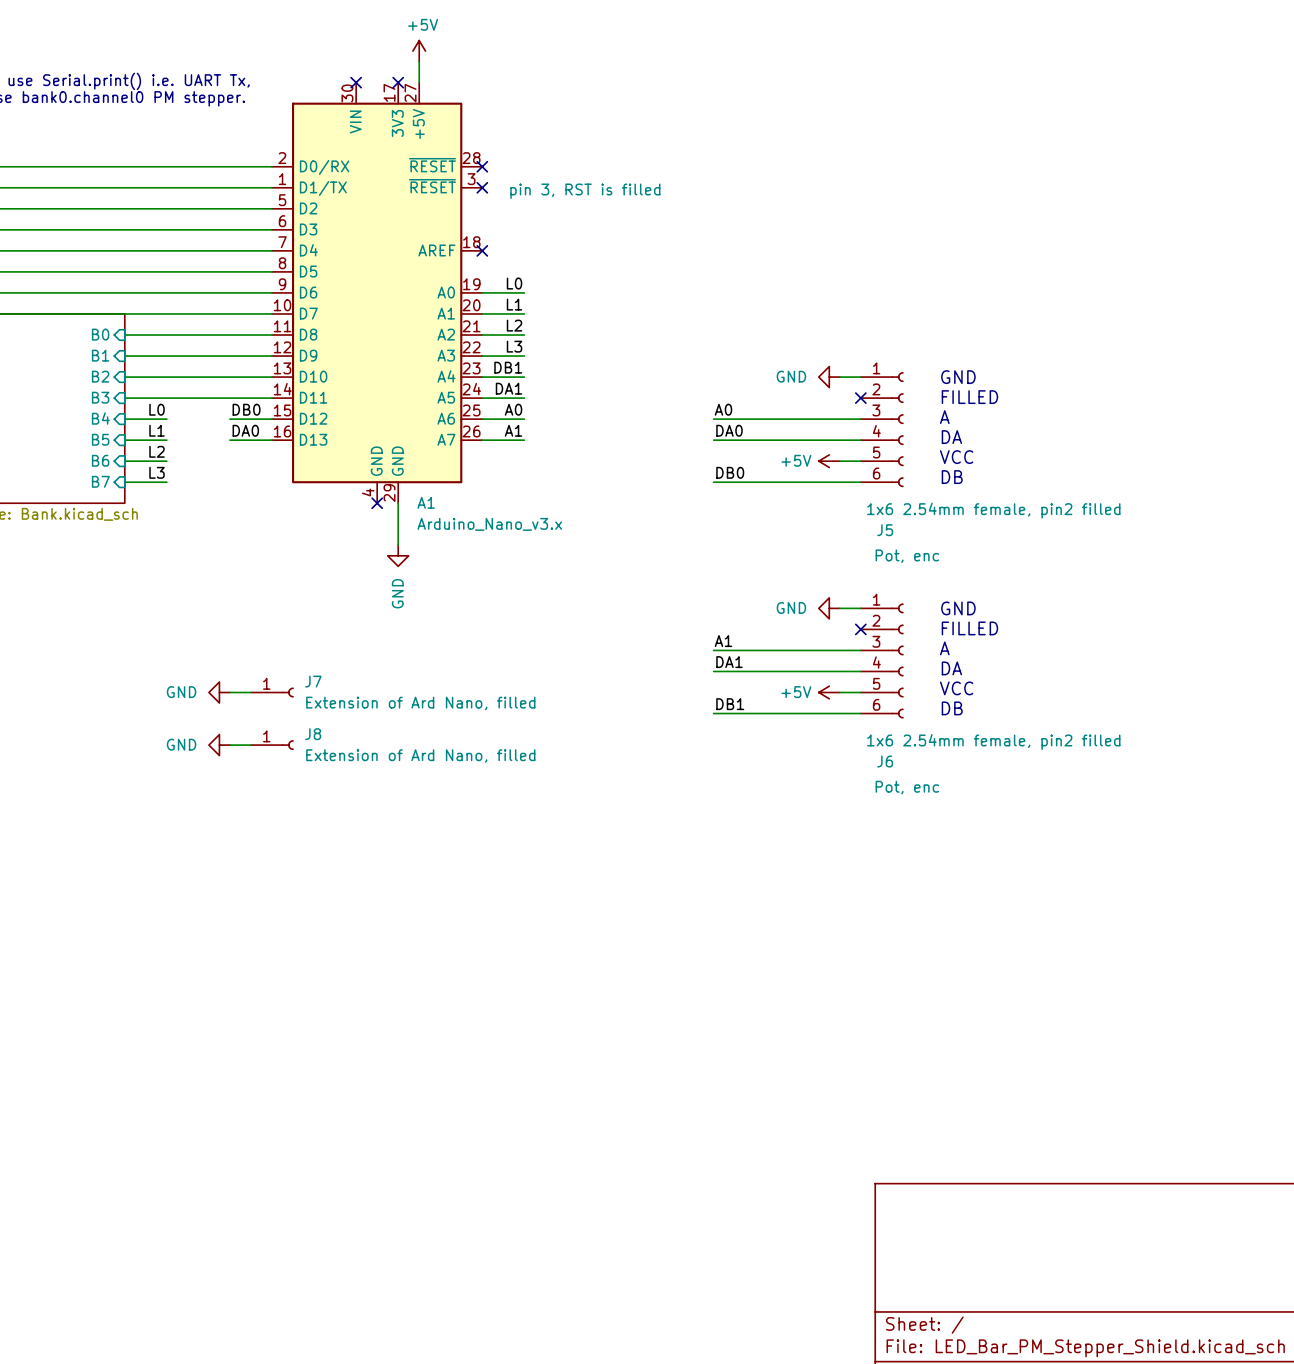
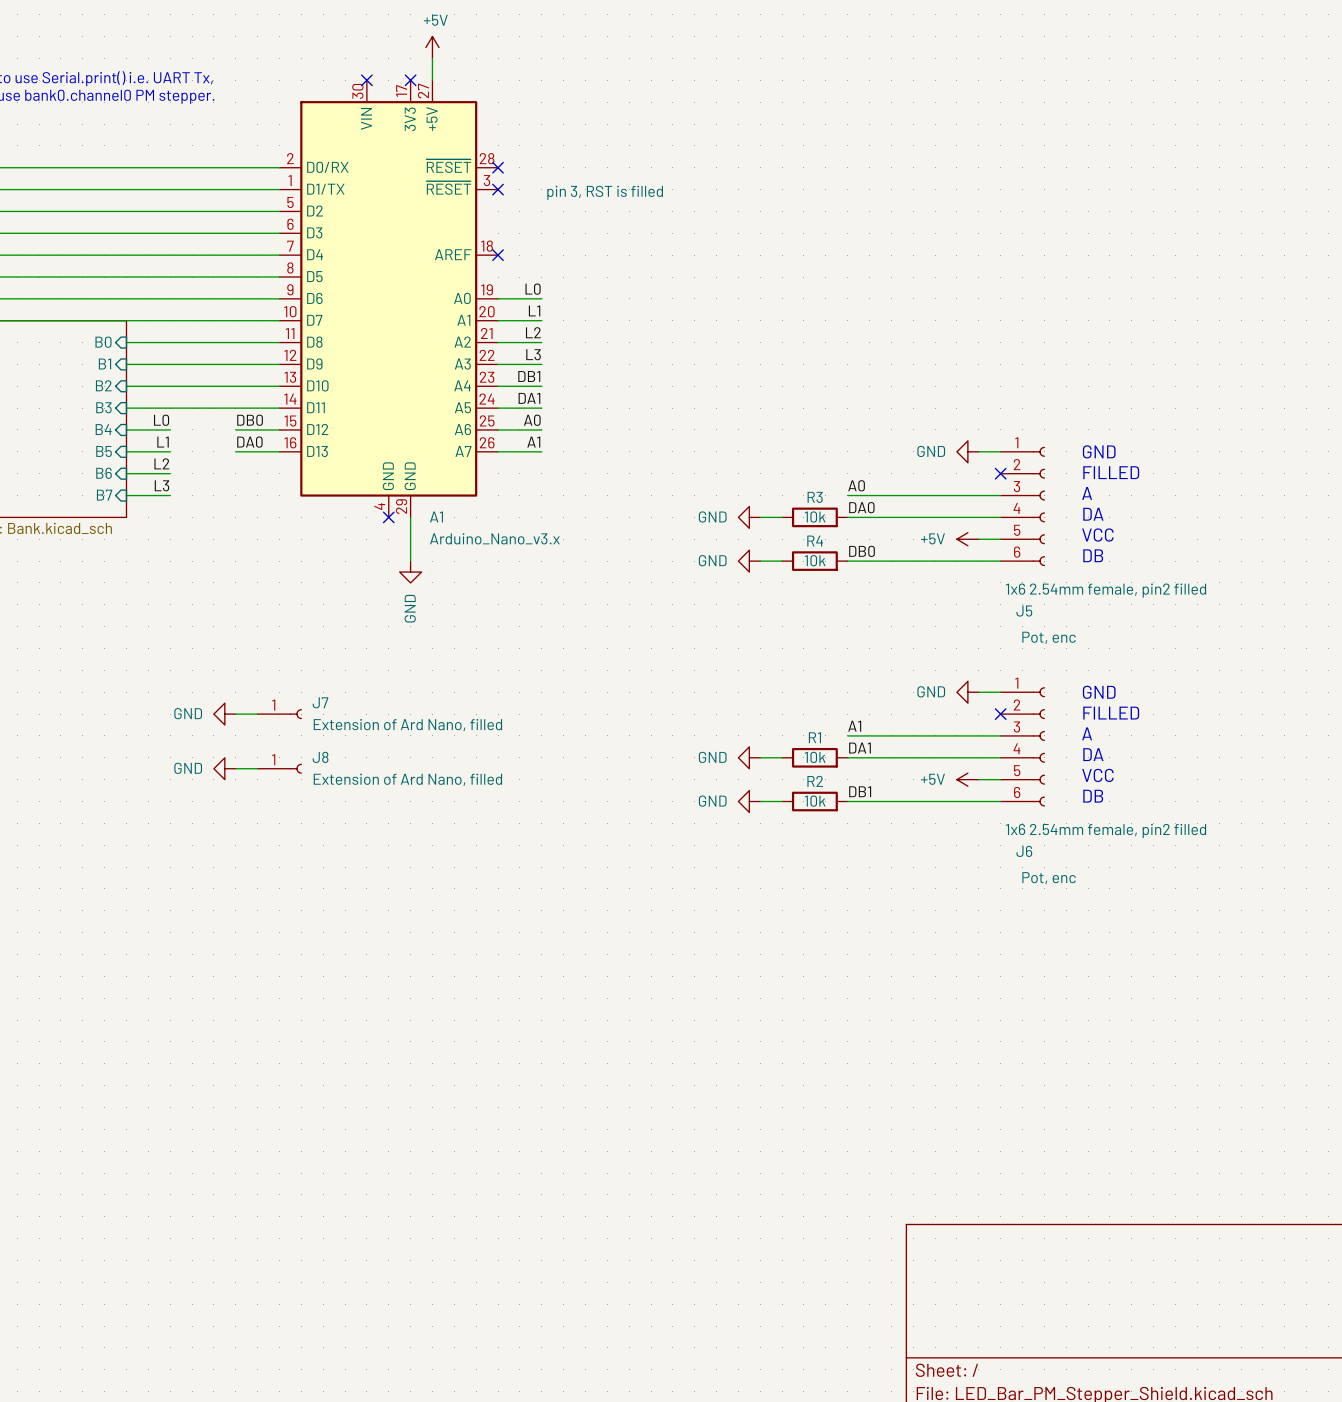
power symbol: GND (829, 377) -> none
wire: (839, 377) (860, 377) -> (978, 451) (1000, 451)
text: GND (958, 377) -> none
text: FILLED (969, 397) -> none
no-connect mark: (860, 398) -> none
label position: A0 (723, 409) -> A0 (856, 485)
text: A (944, 417) -> none
wire: (713, 419) (860, 419) -> (847, 561) (1000, 561)
J5 position: (882, 429) -> (1022, 506)
label position: DA0 (729, 430) -> DA0 (861, 507)
text: DA (951, 437) -> none
wire: (713, 440) (860, 440) -> (847, 517) (1000, 517)
power symbol: none -> GND (967, 451)
text: none -> GND (1099, 451)
text: VCC (956, 457) -> none
text: none -> FILLED (1111, 472)
power symbol: +5V (829, 461) -> none
wire: (839, 461) (860, 461) -> (978, 539) (1000, 539)
no-connect mark: none -> (1000, 473)
label position: DB0 (730, 472) -> DB0 (862, 551)
text: DB (952, 477) -> none
text: none -> A (1087, 493)
wire: (713, 482) (818, 482) -> (891, 495) (1000, 495)
text: none -> DA (1093, 514)
power symbol: none -> GND (749, 517)
wire: none -> (760, 517) (782, 517)
R3: none -> 10k (814, 517)
text: none -> VCC (1097, 535)
power symbol: none -> +5V (967, 539)
text: none -> DB (1093, 555)
power symbol: none -> GND (749, 561)
wire: none -> (760, 561) (782, 561)
R4: none -> 10k (814, 561)
power symbol: GND (829, 608) -> none
wire: (839, 608) (860, 608) -> (978, 692) (1000, 692)
text: GND (958, 608) -> none
text: FILLED (969, 628) -> none
no-connect mark: (860, 629) -> none
label position: A1 (723, 641) -> A1 (854, 726)
text: A (944, 648) -> none
wire: (713, 650) (860, 650) -> (847, 801) (1000, 801)
J6 position: (882, 660) -> (1022, 746)
label position: DA1 (729, 662) -> DA1 (860, 748)
text: DA (951, 668) -> none
wire: (713, 671) (860, 671) -> (847, 757) (1000, 757)
power symbol: none -> GND (967, 692)
text: none -> GND (1099, 692)
text: VCC (956, 688) -> none
text: none -> FILLED (1111, 713)
power symbol: +5V (829, 692) -> none
wire: (839, 692) (860, 692) -> (978, 779) (1000, 779)
no-connect mark: none -> (1000, 714)
label position: DB1 (730, 704) -> DB1 (860, 791)
text: DB (952, 708) -> none
text: none -> A (1087, 733)
wire: (713, 713) (818, 713) -> (891, 735) (1000, 735)
text: none -> DA (1093, 754)
power symbol: none -> GND (749, 757)
wire: none -> (760, 757) (782, 757)
R1: none -> 10k (814, 757)
text: none -> VCC (1097, 775)
power symbol: none -> +5V (967, 779)
text: none -> DB (1093, 796)
power symbol: none -> GND (749, 801)
wire: none -> (760, 801) (782, 801)
R2: none -> 10k (814, 801)

